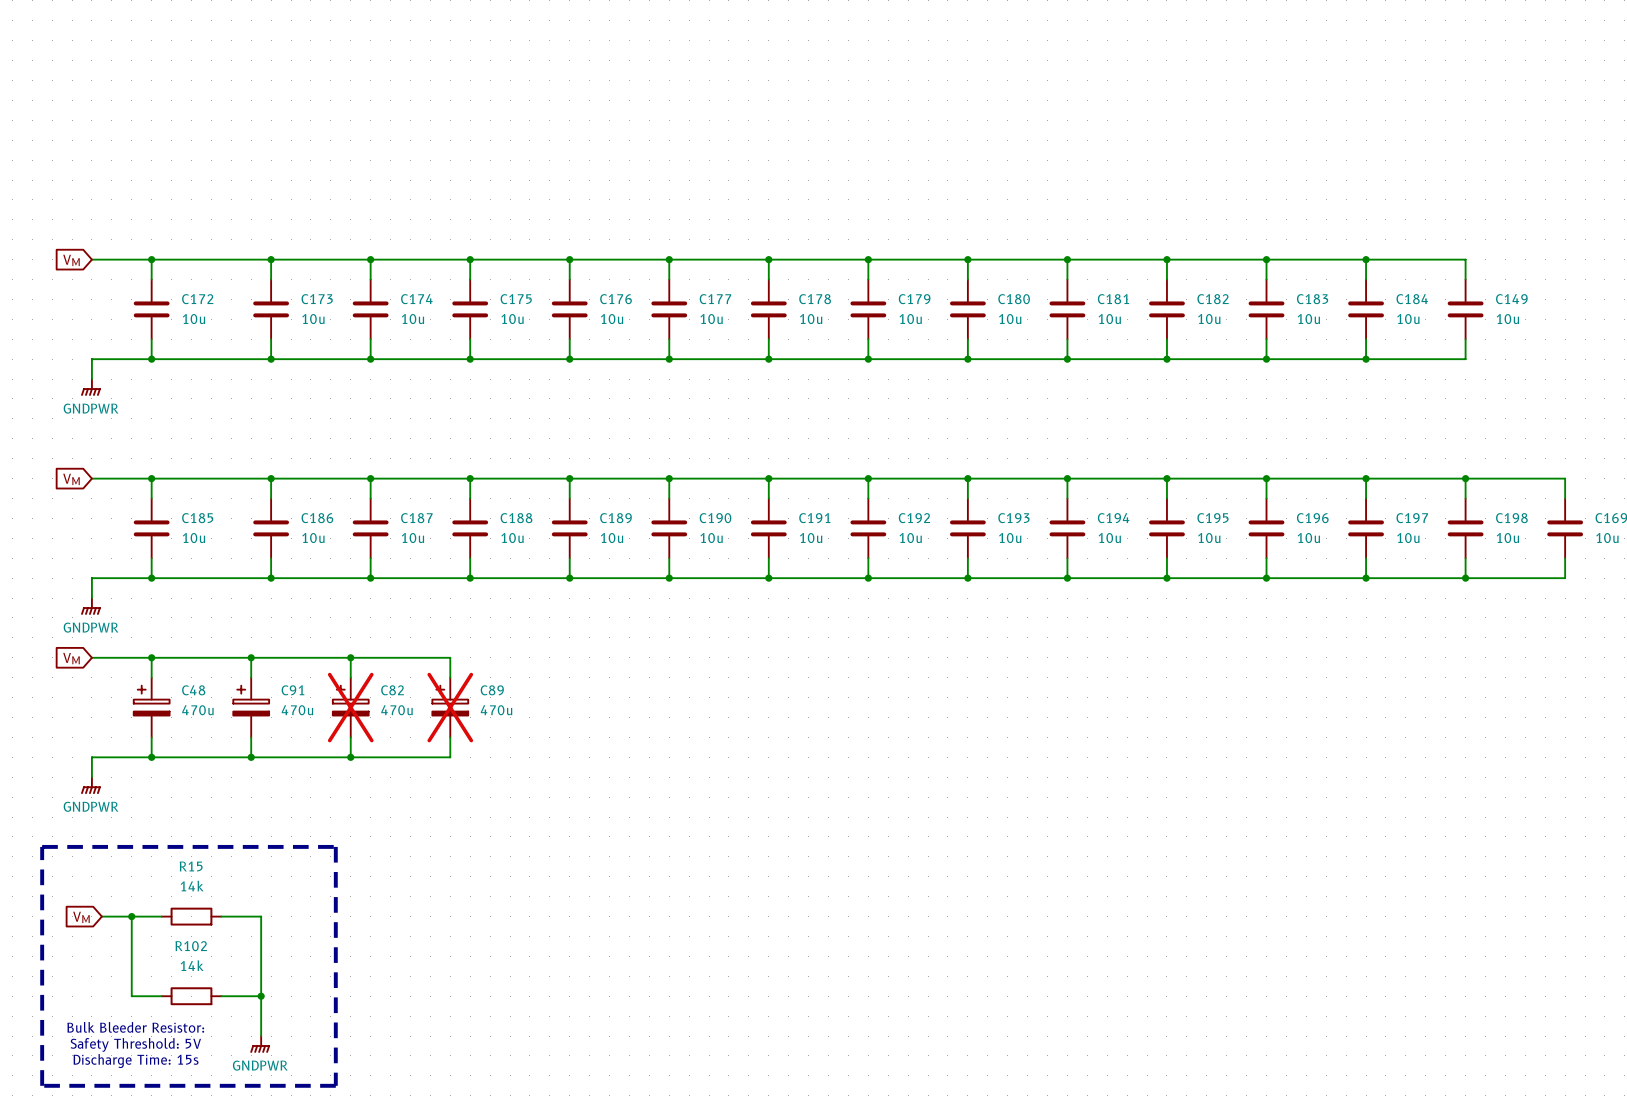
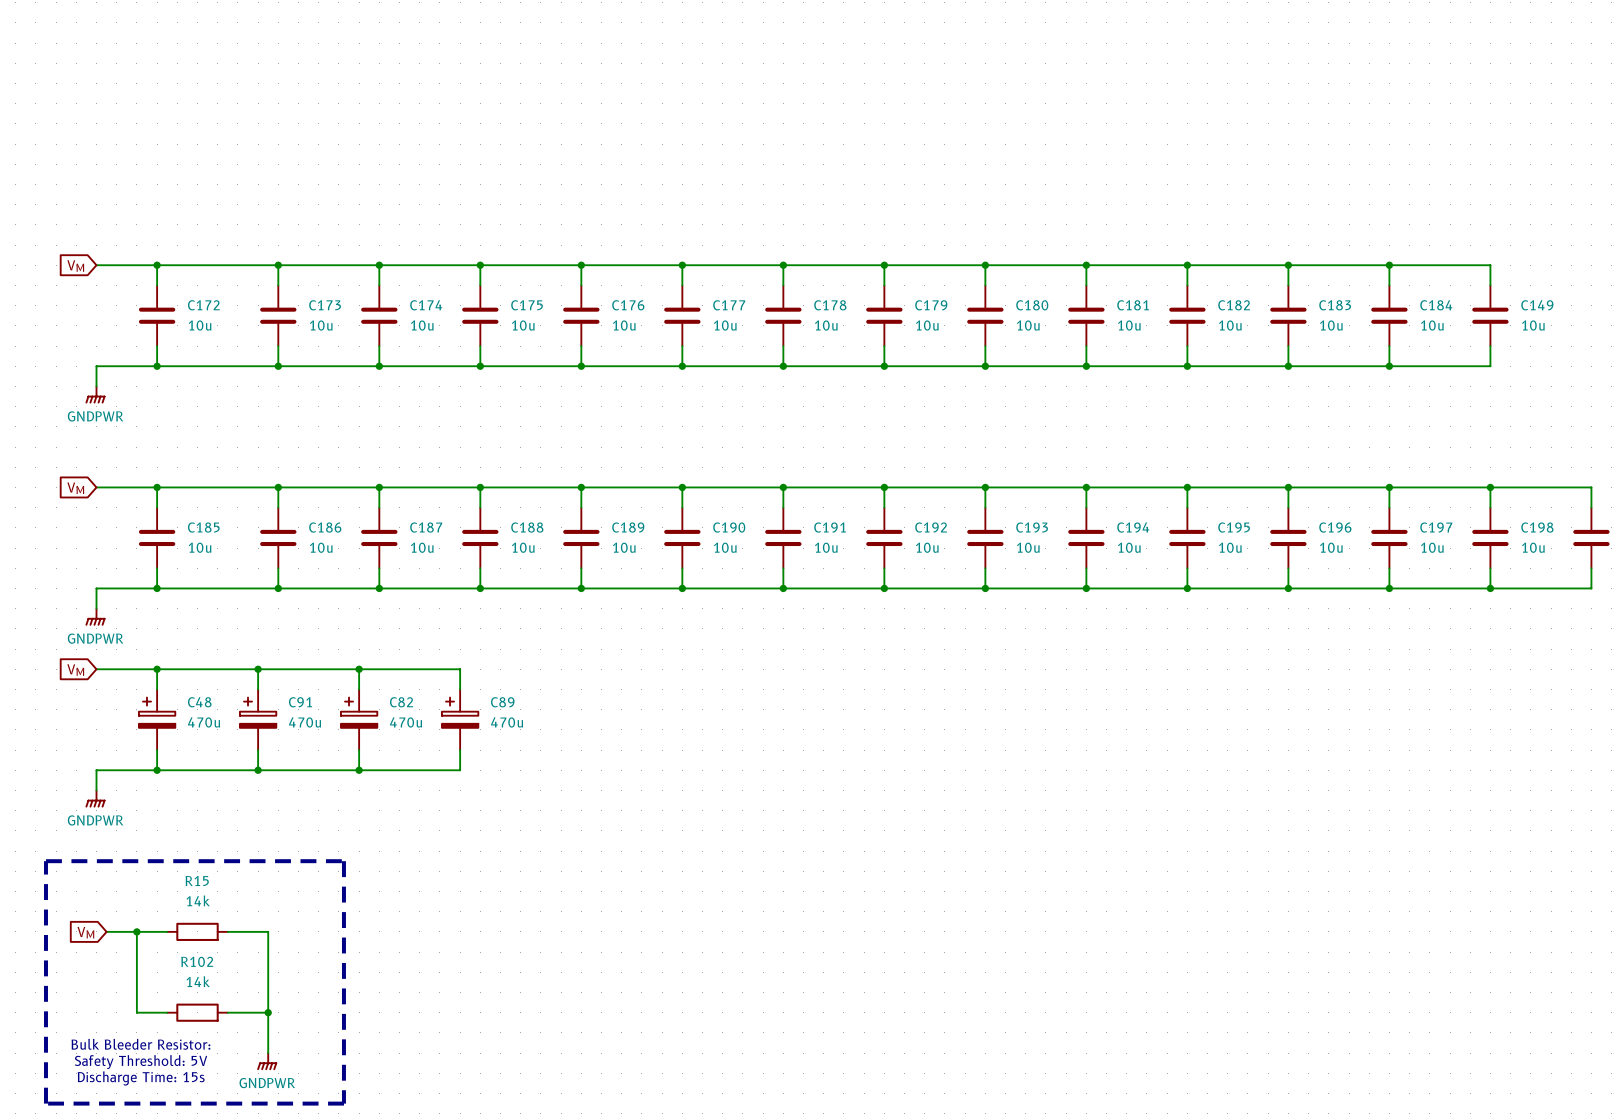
C82 do-not-place cross: (350, 707) -> none
C89 do-not-place cross: (450, 707) -> none

